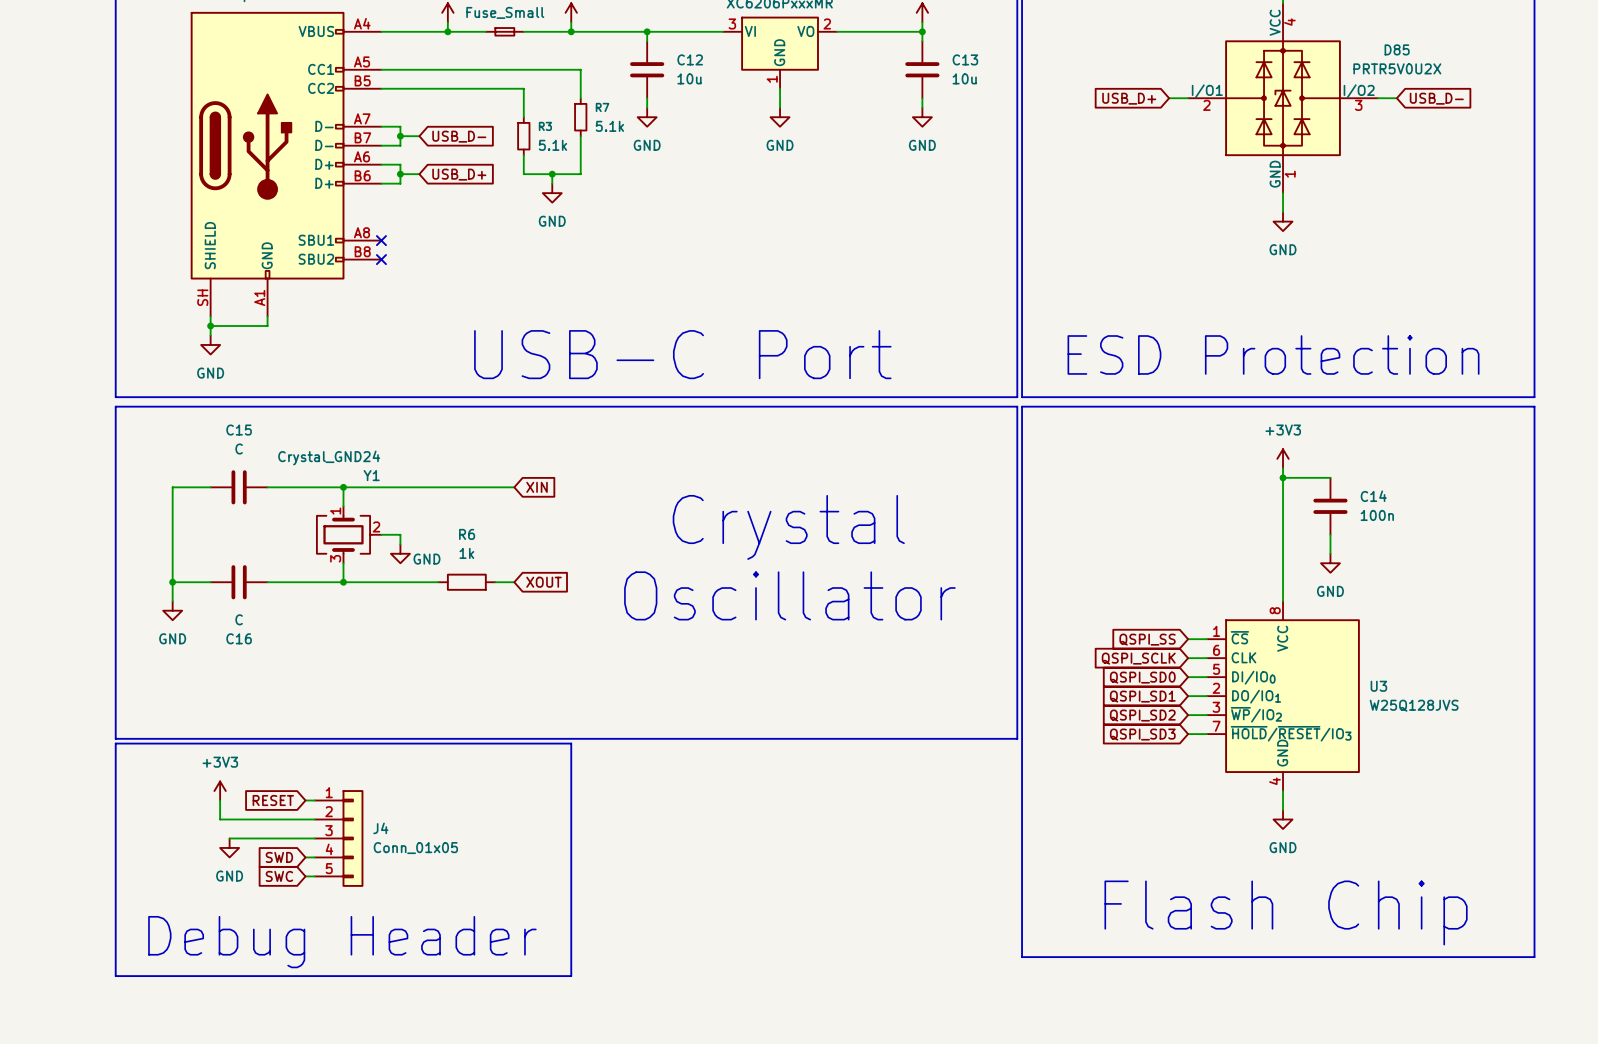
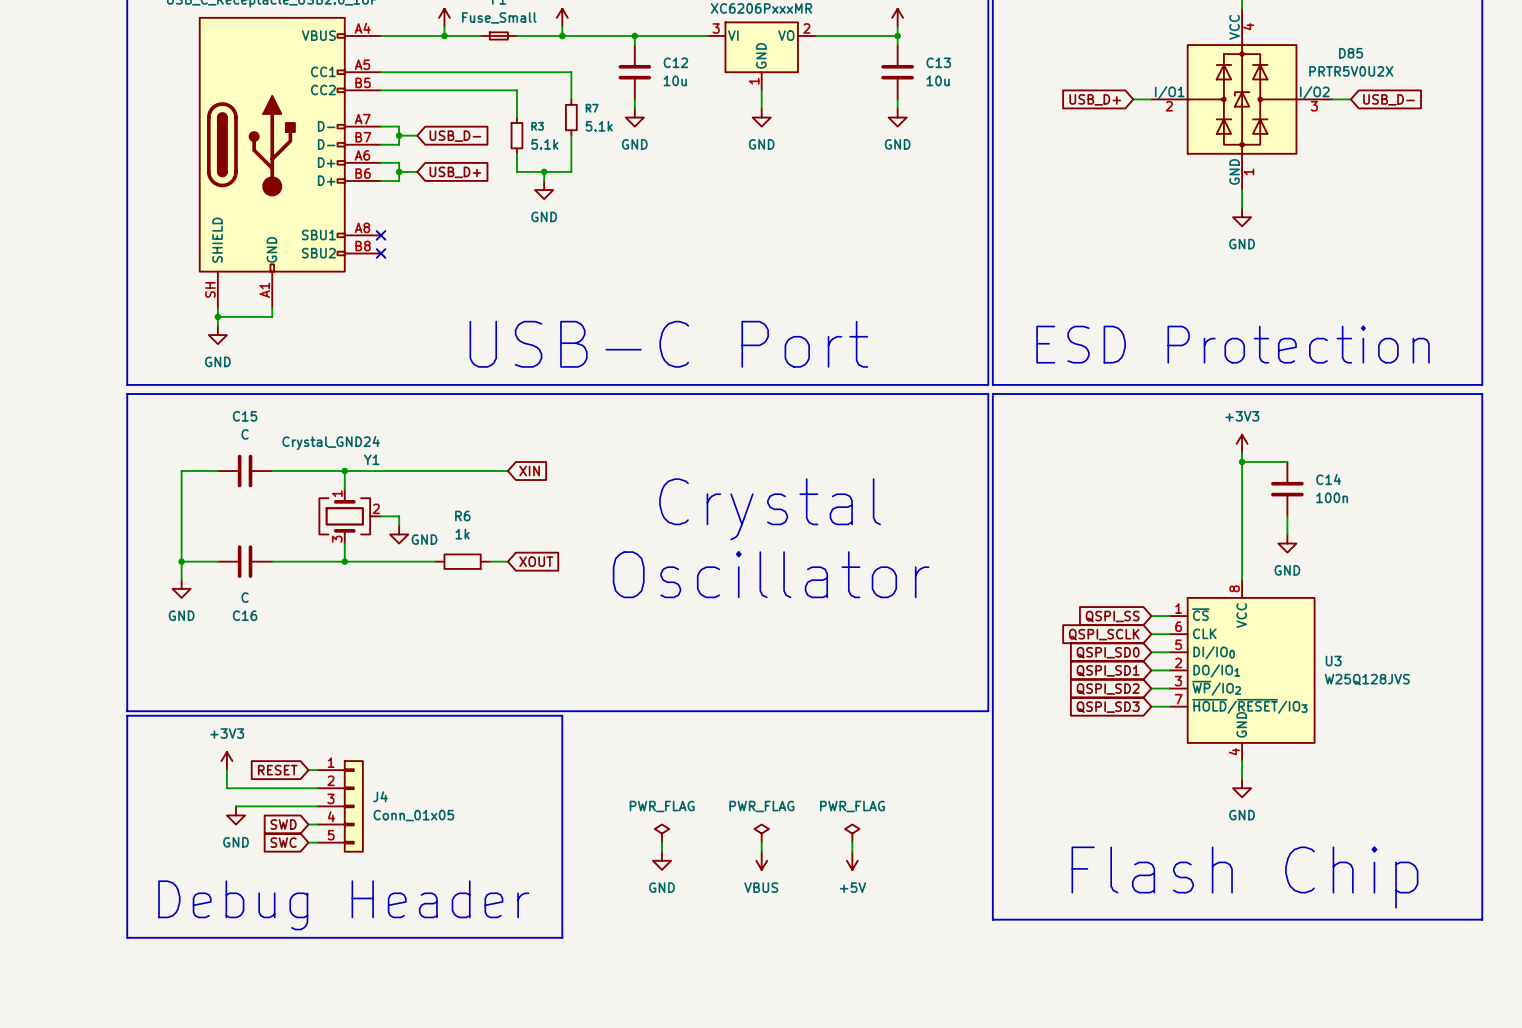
power symbol: none -> PWR_FLAG (661, 833)
power symbol: none -> PWR_FLAG (761, 833)
power symbol: none -> PWR_FLAG (852, 833)
wire: none -> (661, 842) (661, 851)
wire: none -> (761, 842) (761, 851)
wire: none -> (852, 842) (852, 851)
power symbol: none -> GND (661, 860)
power symbol: none -> VBUS (761, 860)
power symbol: none -> +5V (852, 860)

